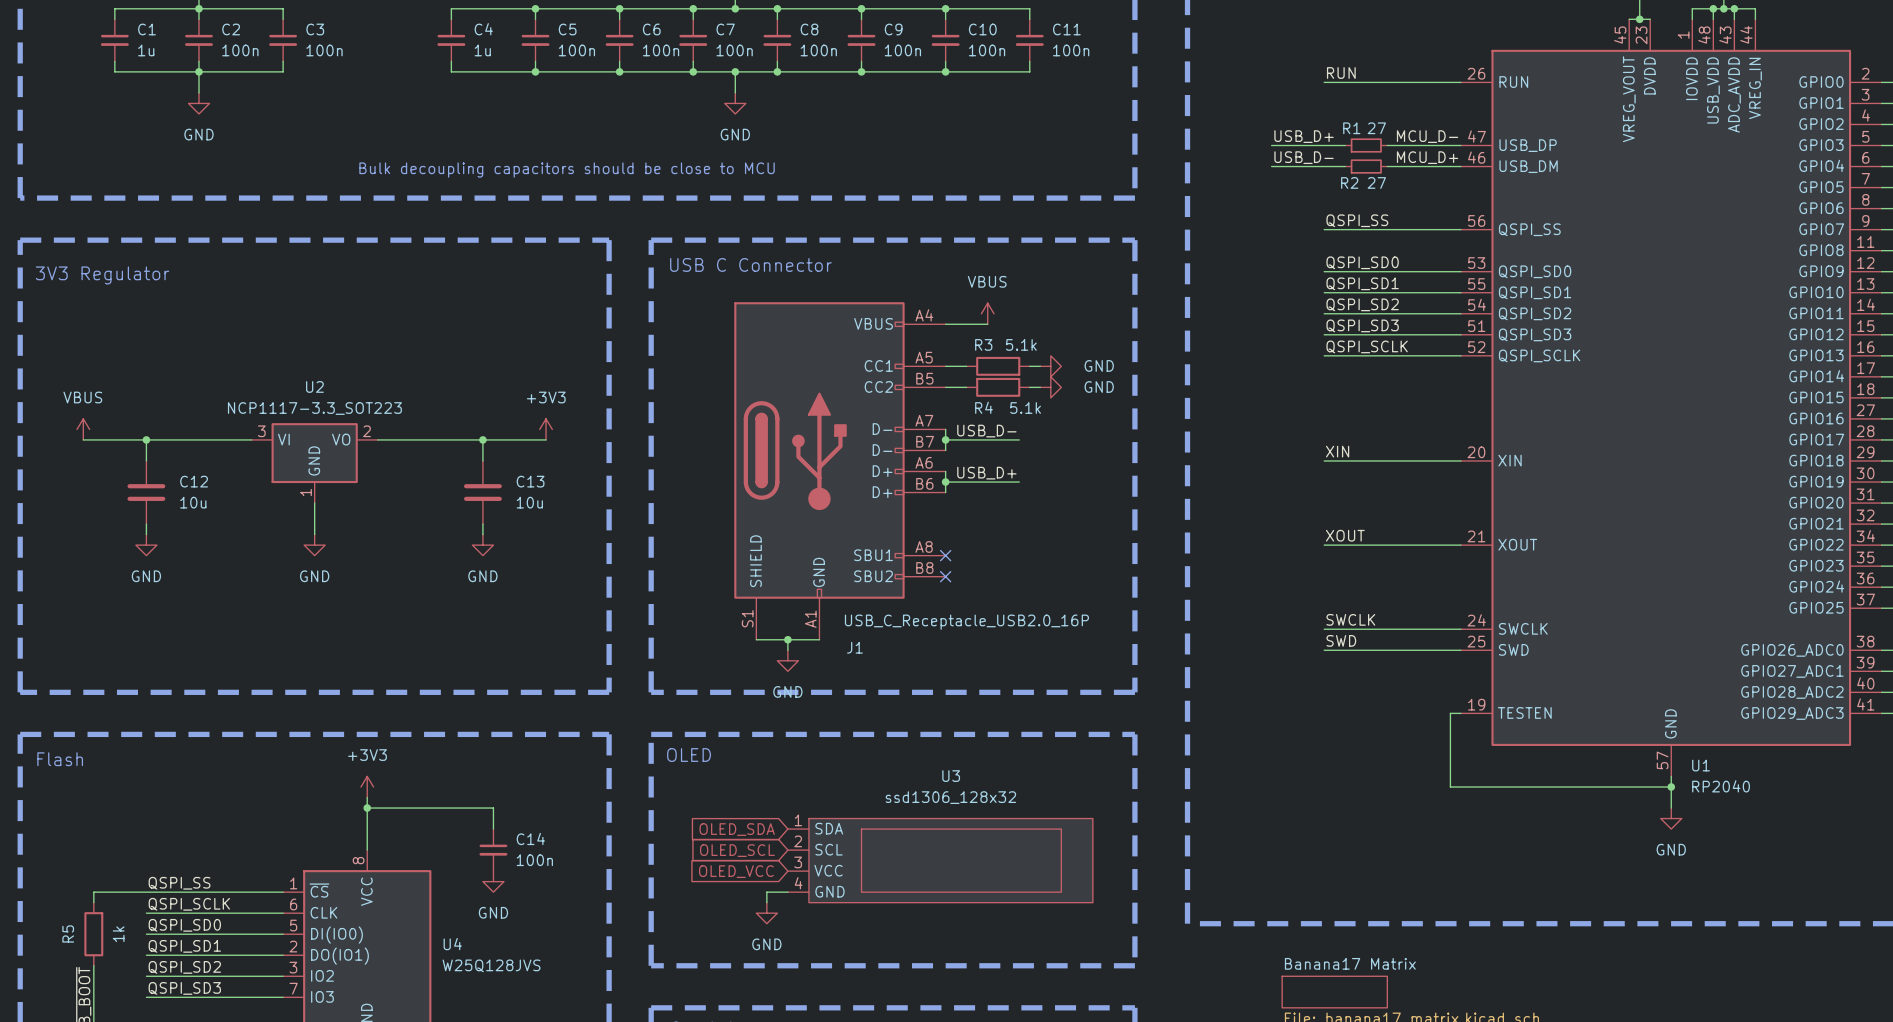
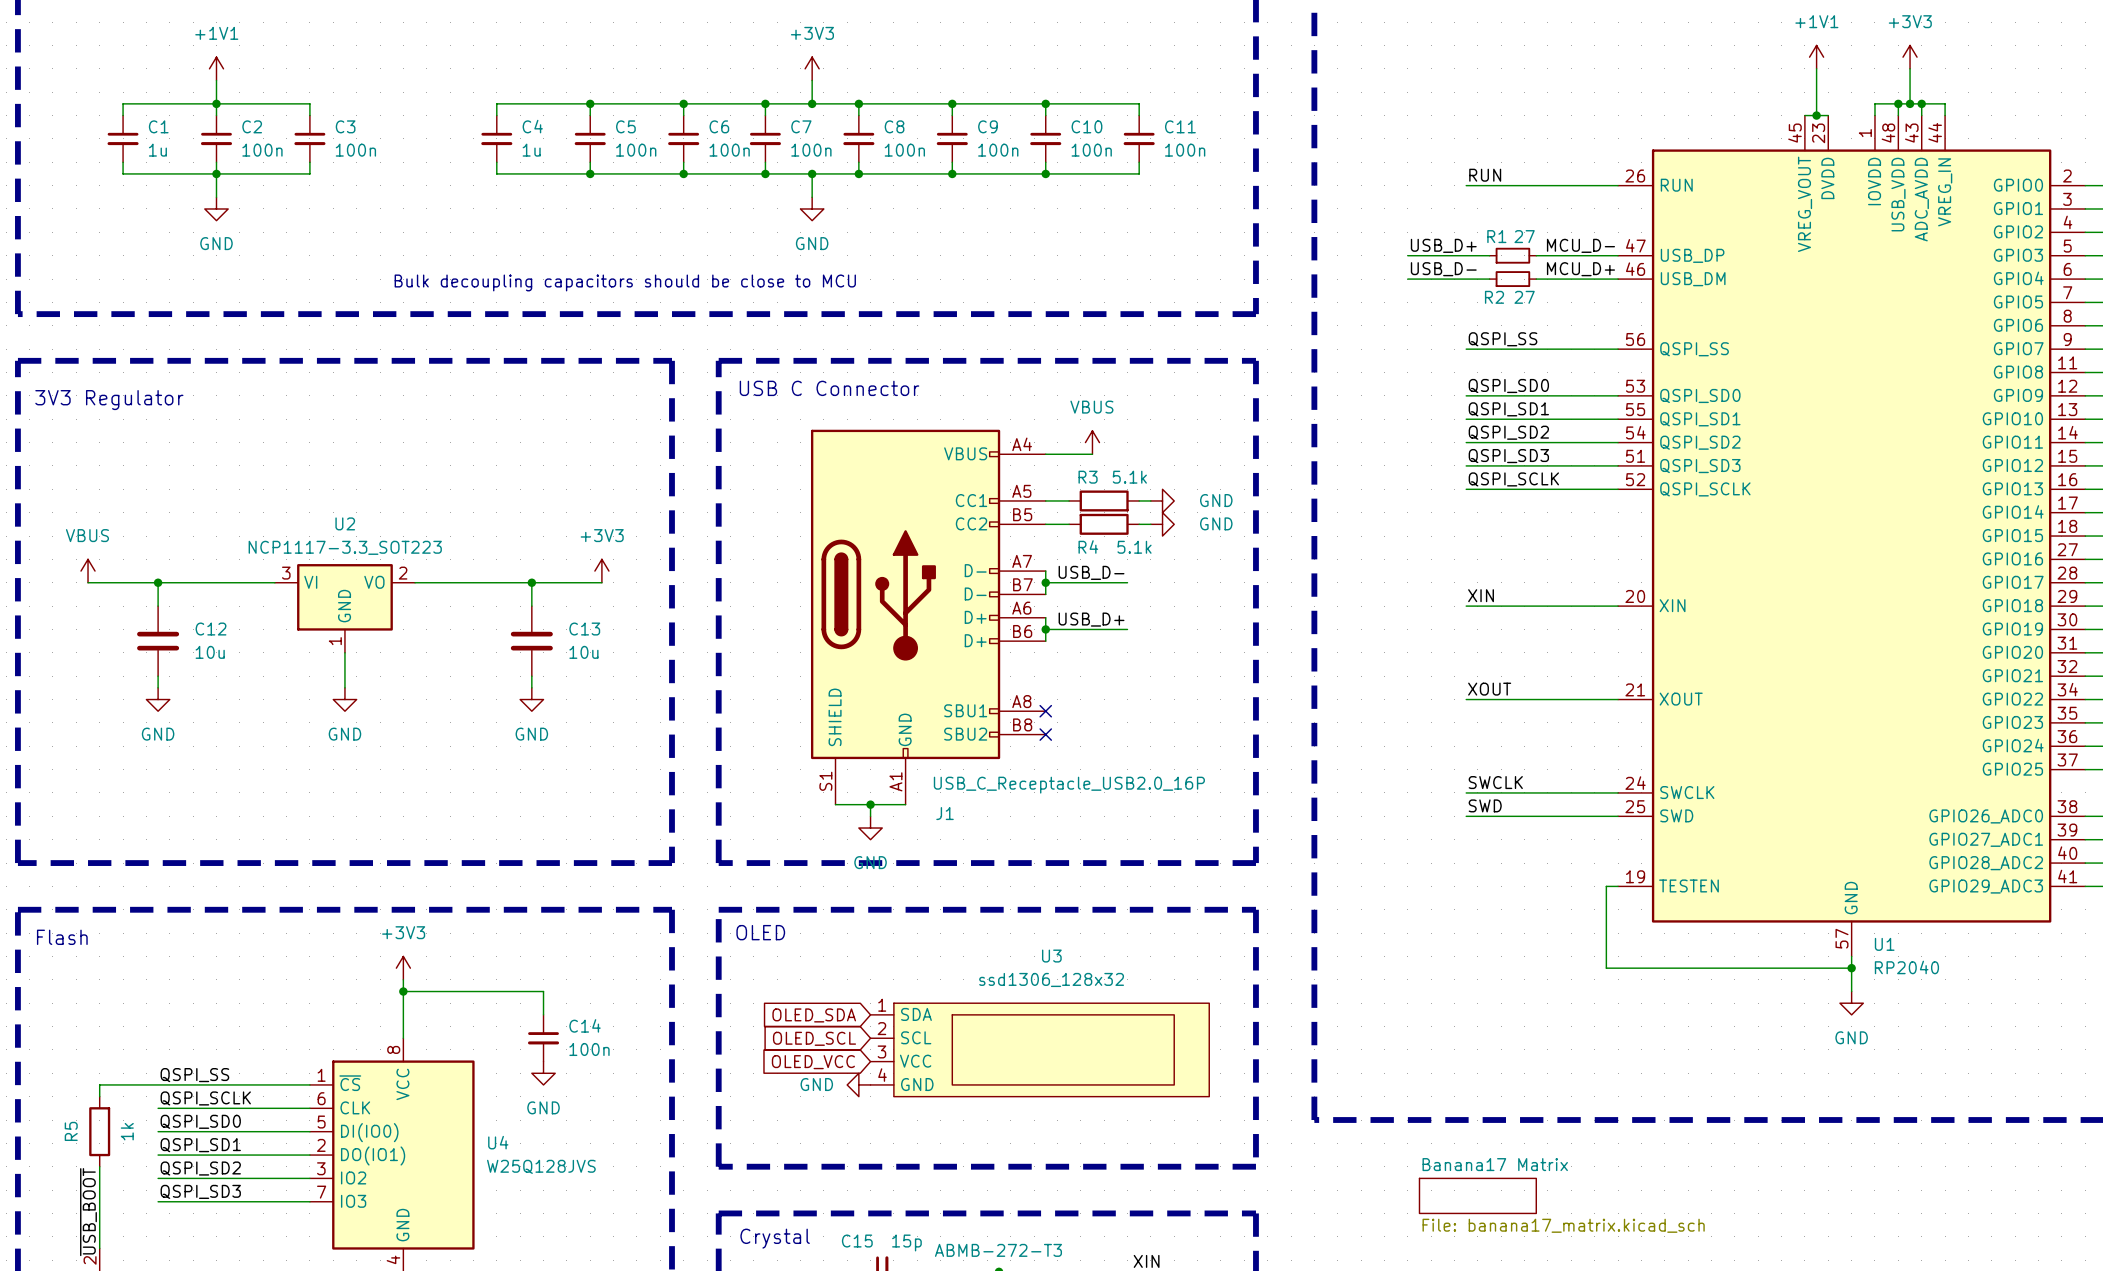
wire: (787, 892) (766, 892) (766, 902) -> none
power symbol rotation: 0° (766, 913) -> 90° clockwise (858, 1084)
power symbol position: GND (766, 913) -> GND (858, 1084)

